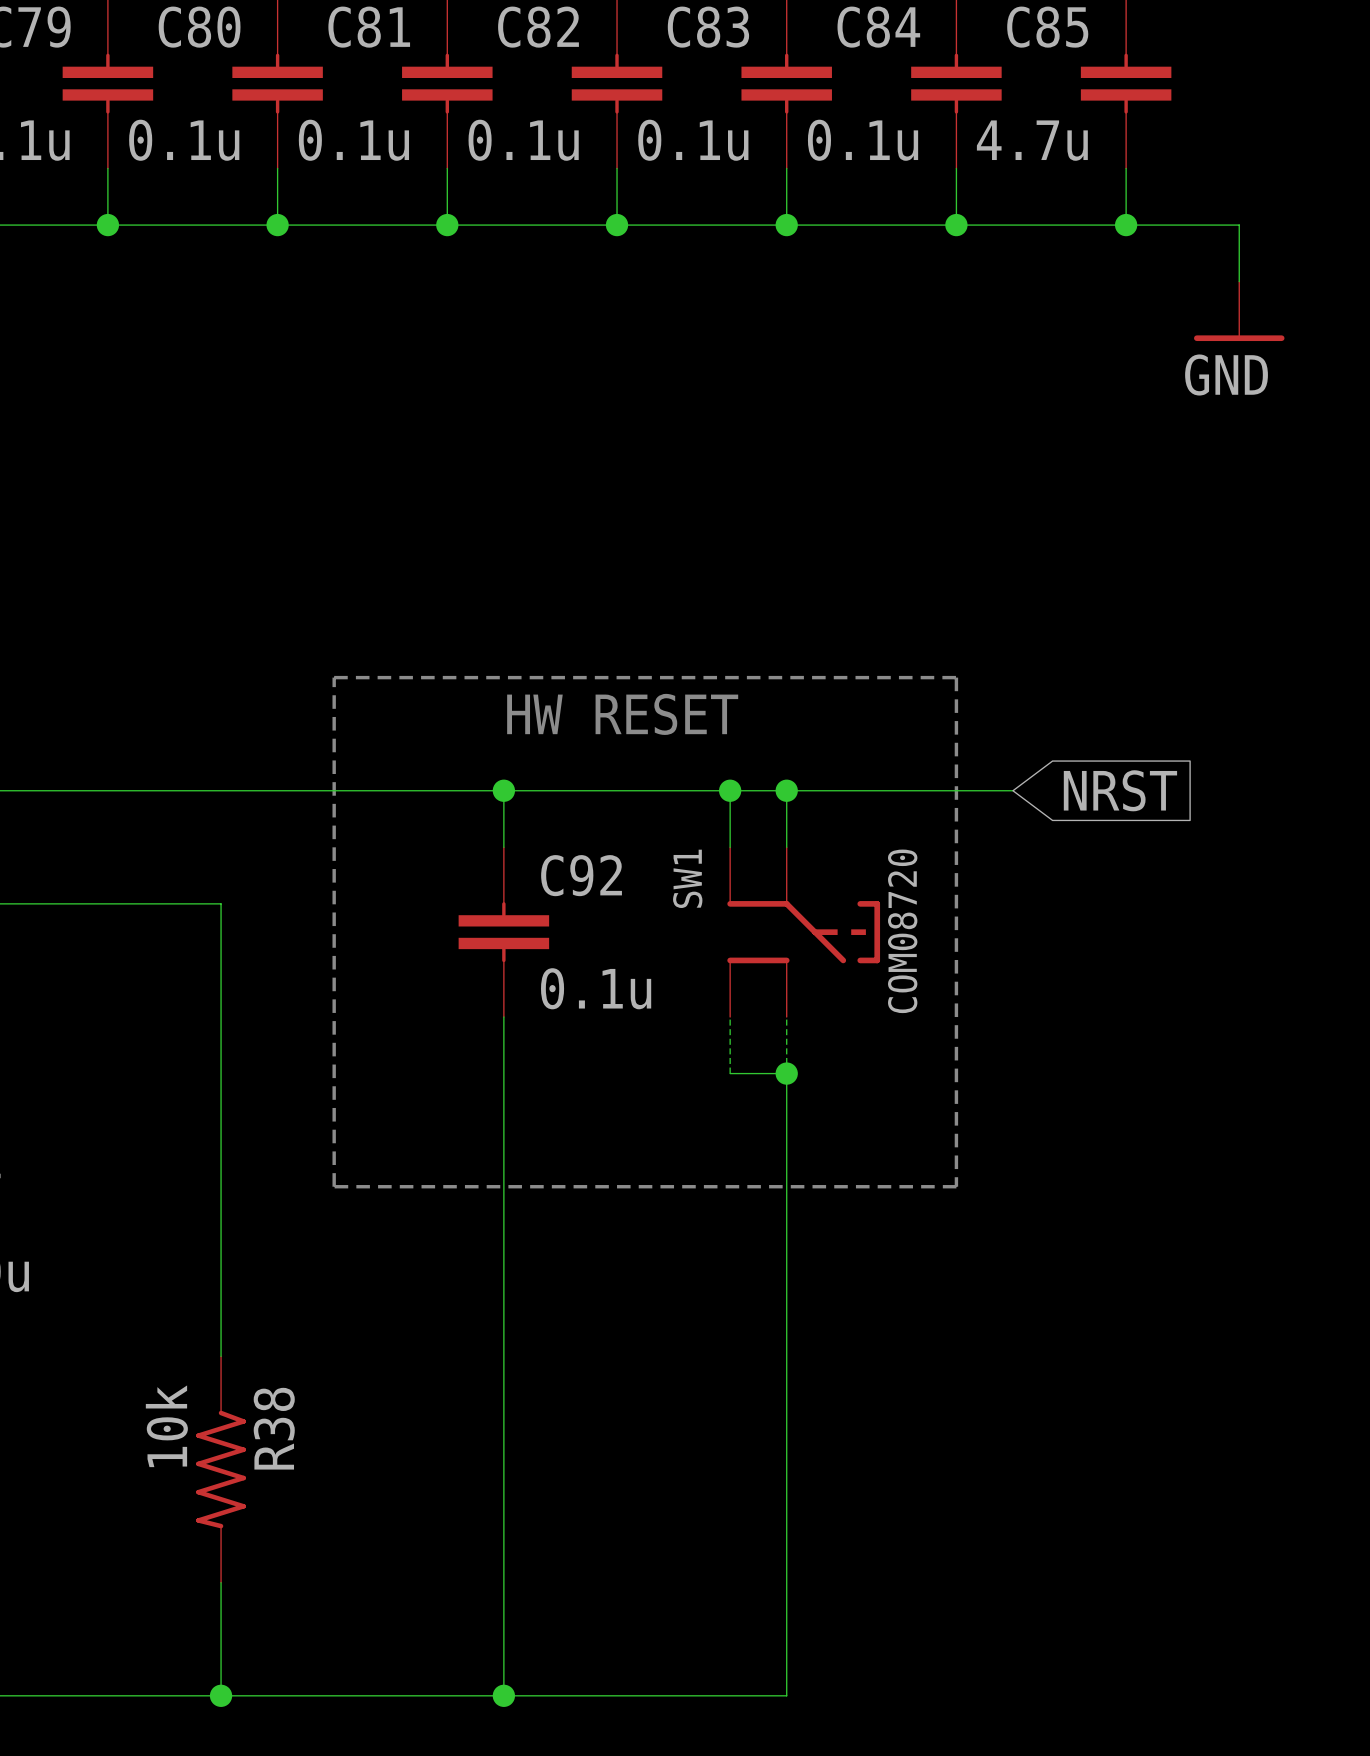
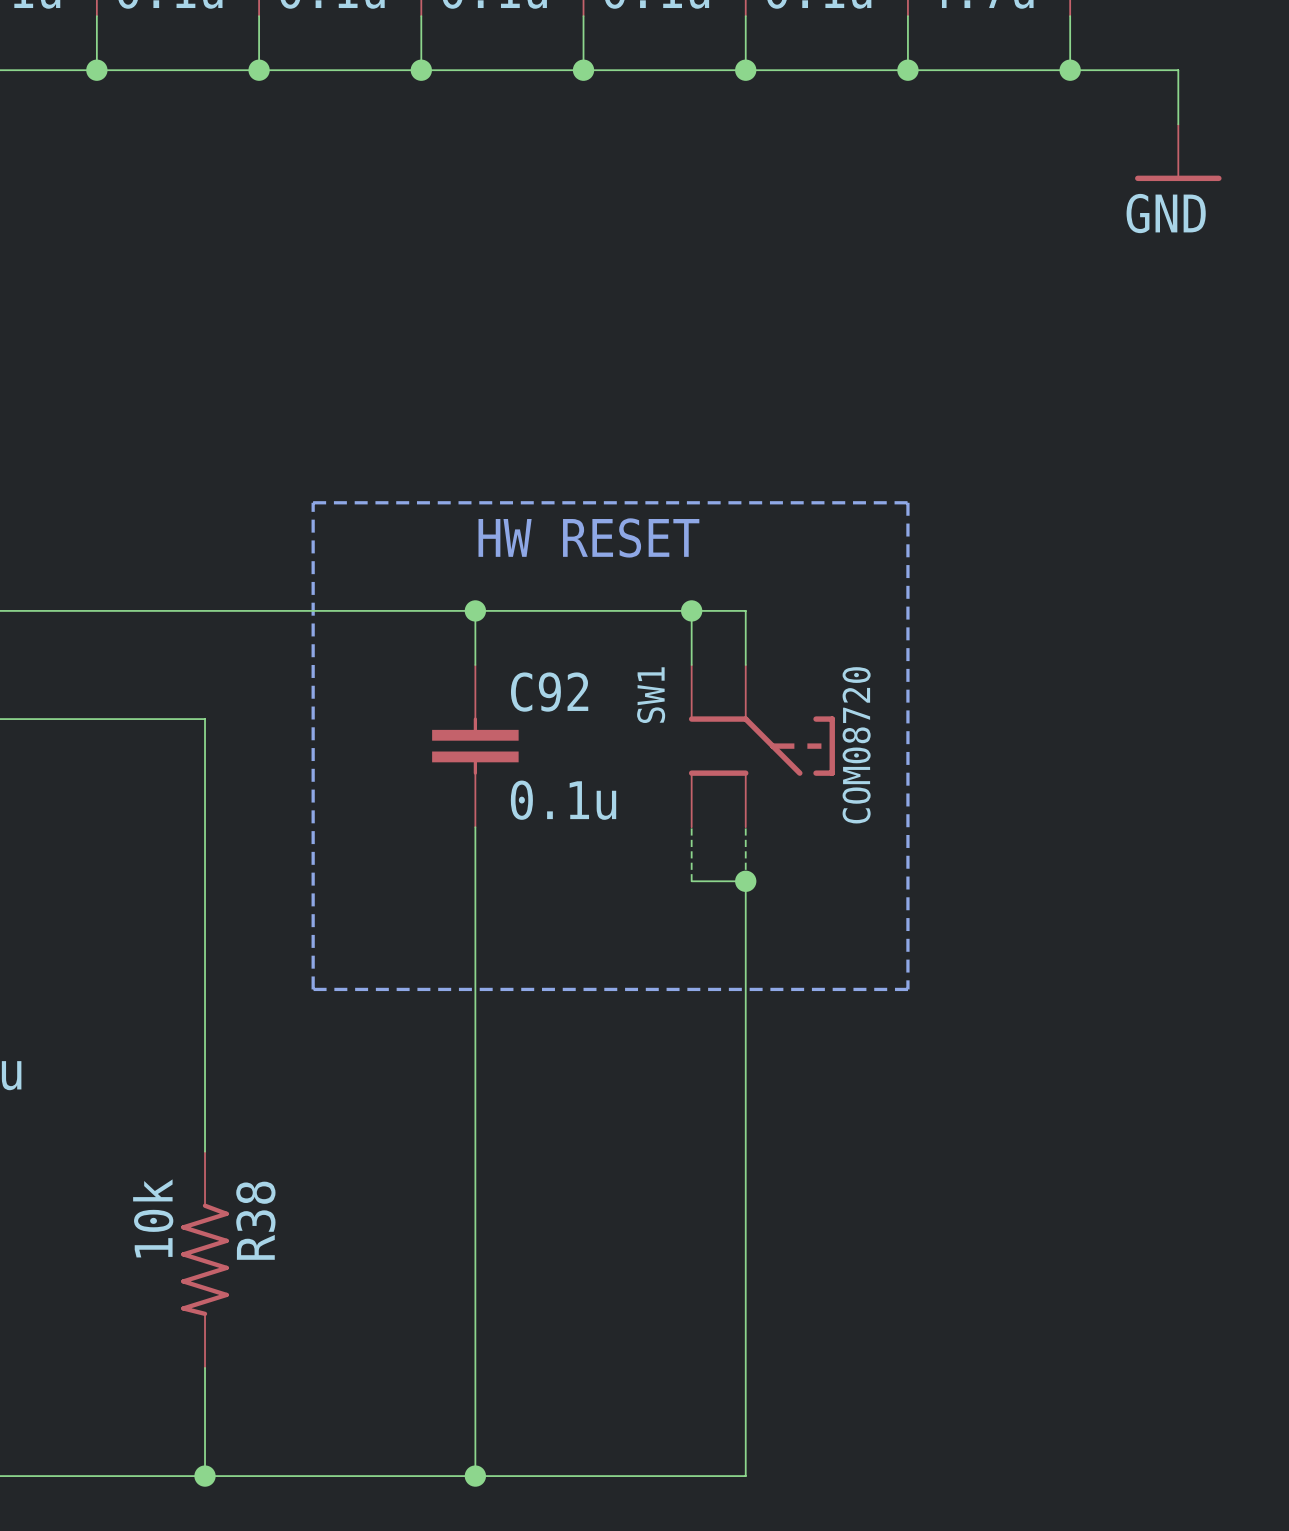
wire: (786, 790) (1012, 790) -> none
junction: (786, 790) -> none
global label: NRST (1120, 790) -> none

